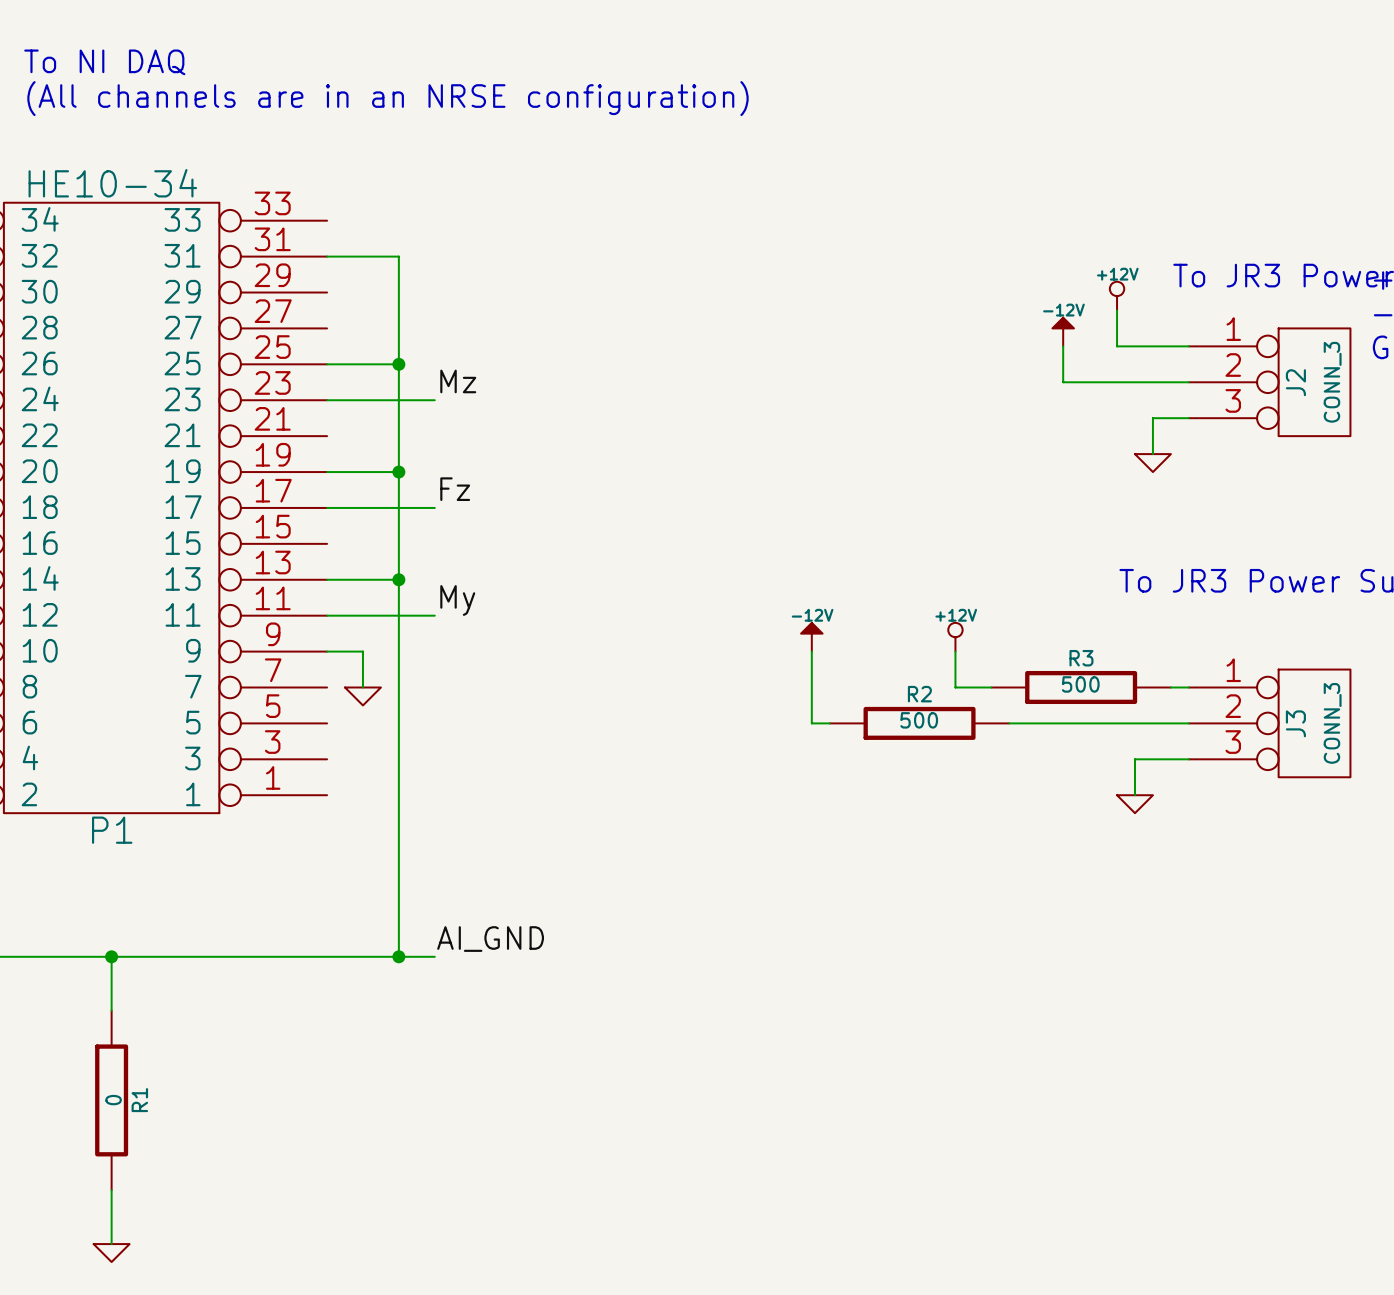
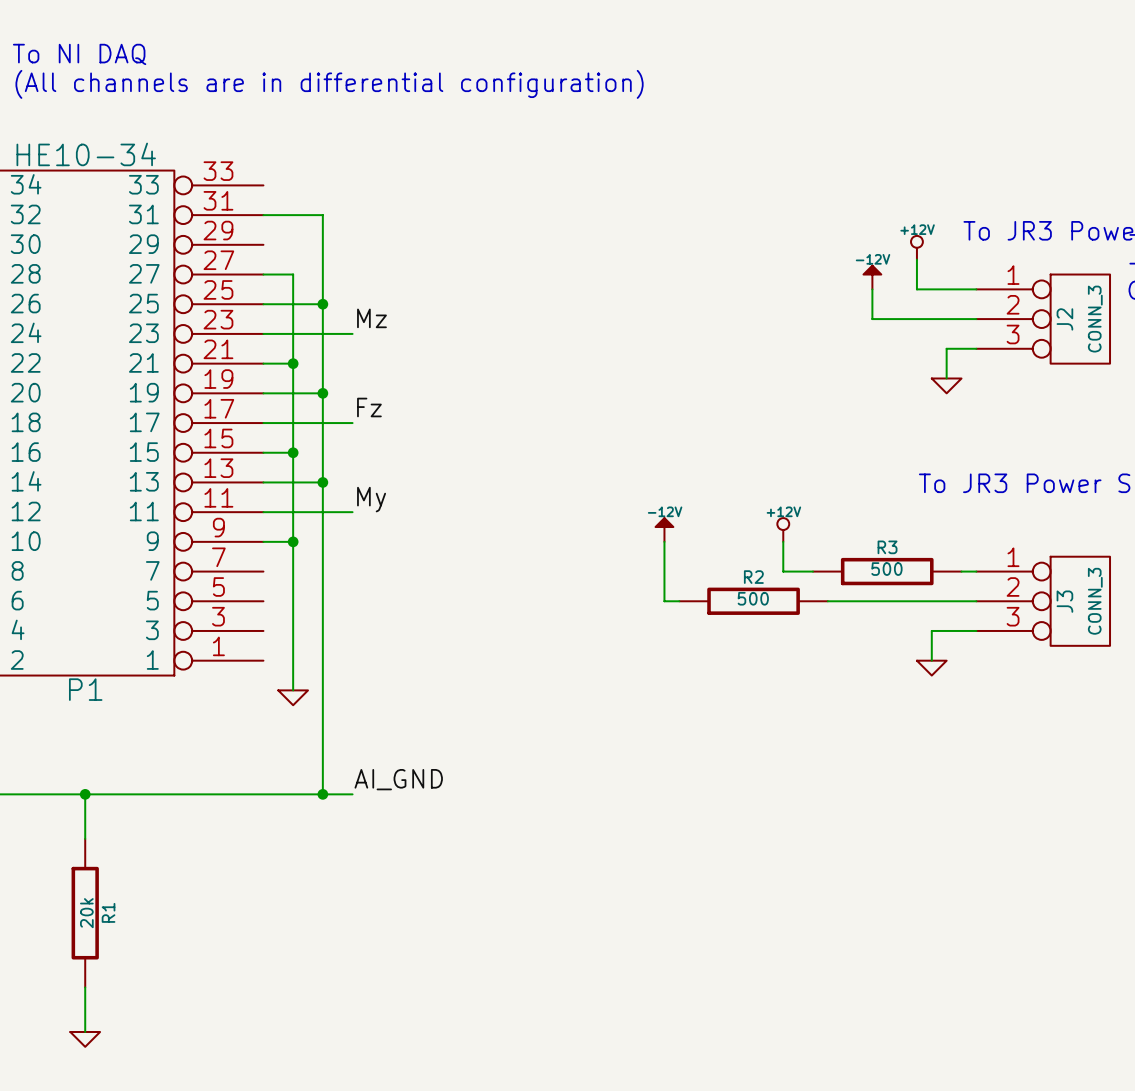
text: (All channels are in an NRSE configuration) (387, 98) -> (All channels are in differential configuration) (329, 84)
wire: none -> (263, 274) (293, 274) (293, 541)
wire: none -> (263, 363) (293, 363)
junction: none -> (293, 363)
wire: none -> (263, 452) (293, 452)
junction: none -> (293, 452)
junction: none -> (293, 541)
wire: none -> (293, 571) (293, 690)
power symbol position: (362, 696) -> (293, 697)
R1 value: 0 (113, 1100) -> 20k (86, 913)

